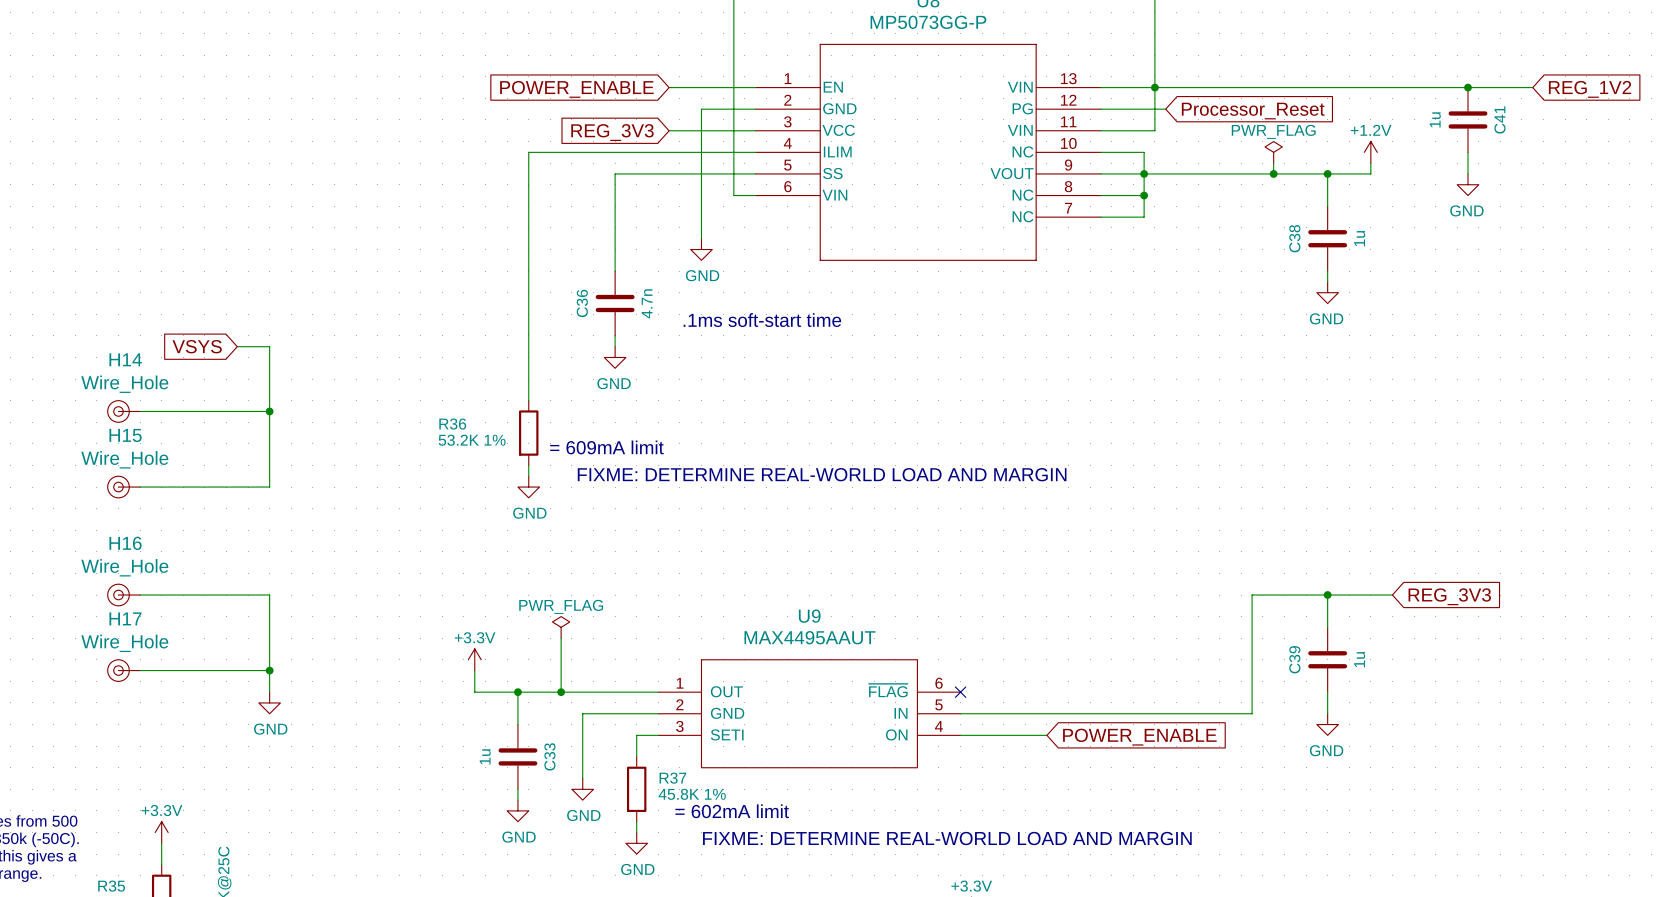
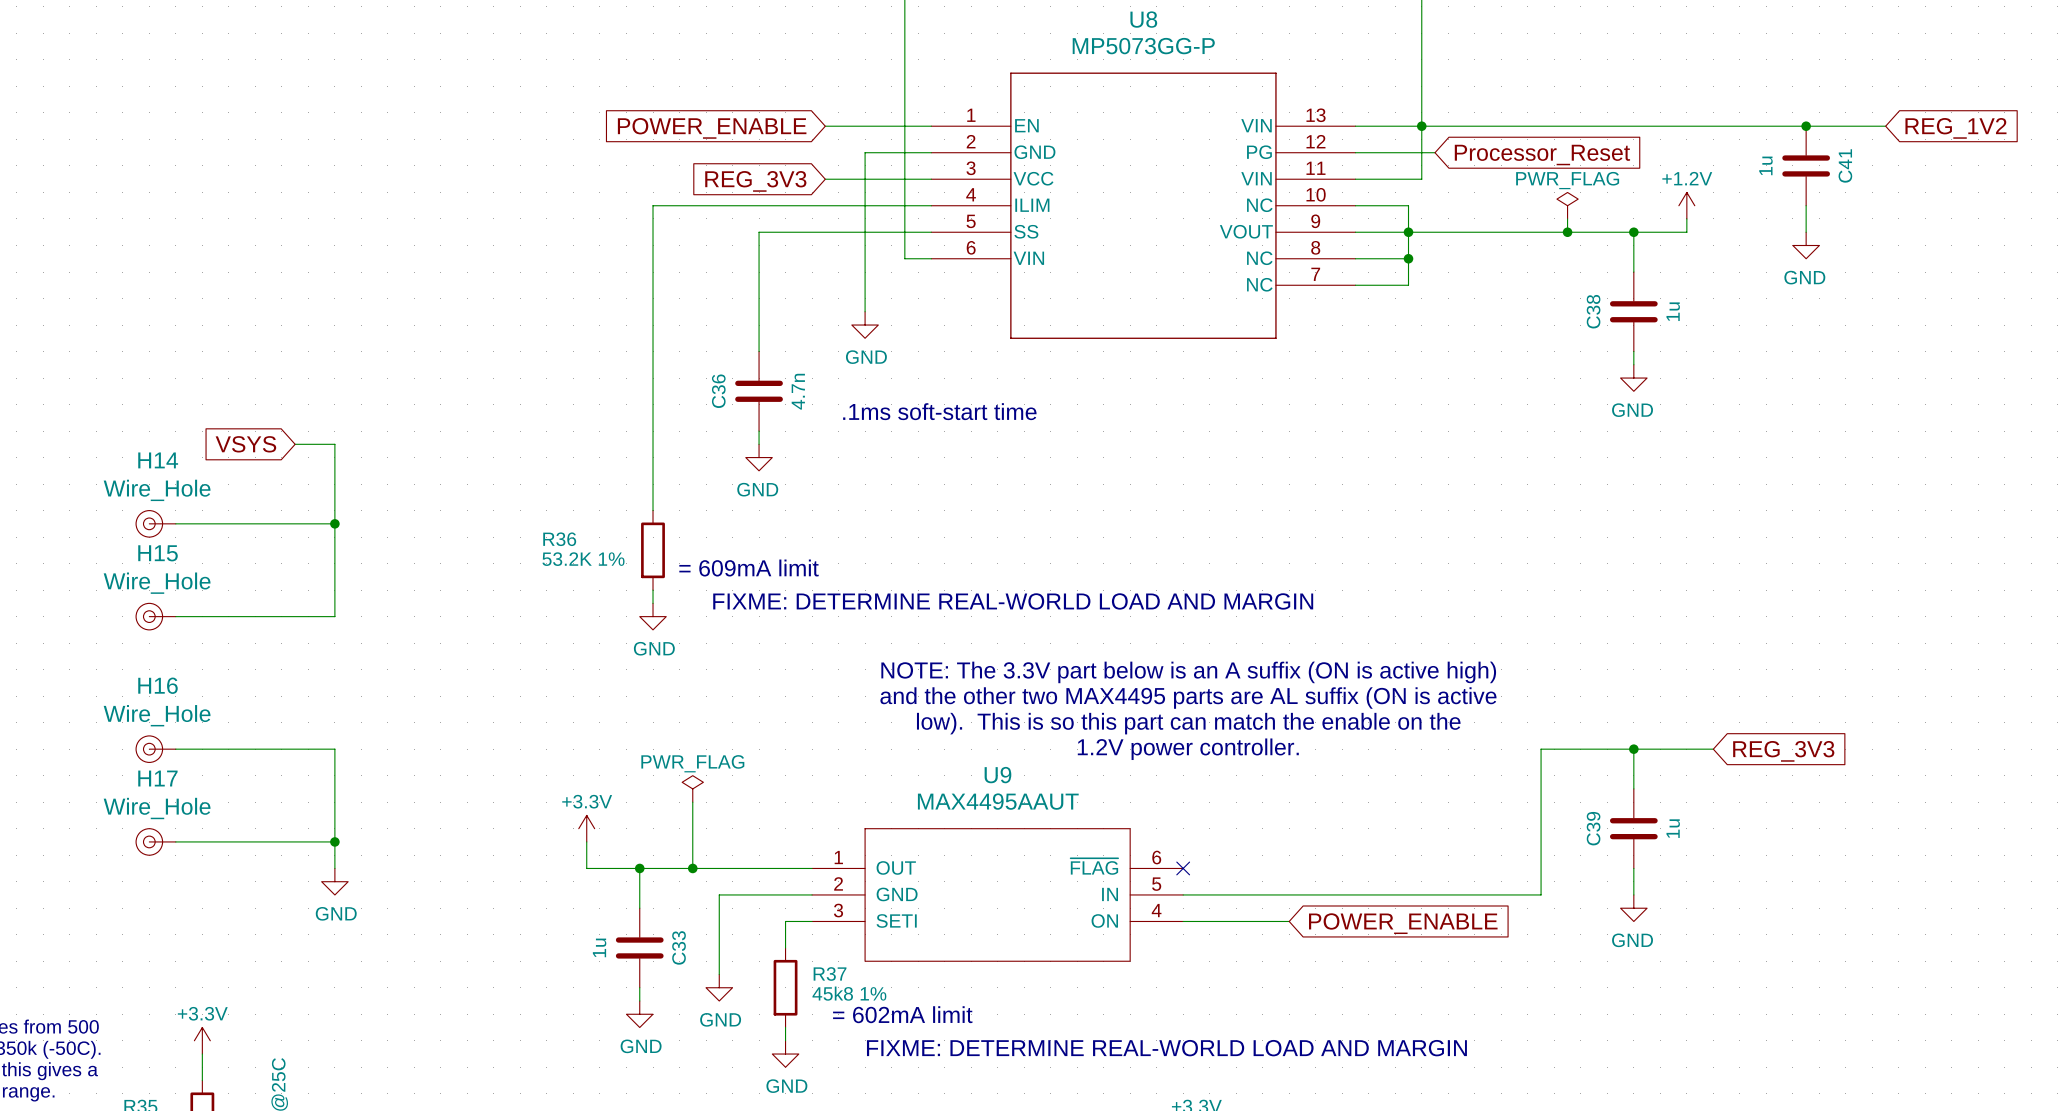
text: none -> NOTE: The 3.3V part below is an A suffix (ON is active high) (1188, 672)
text: none -> and the other two MAX4495 parts are AL suffix (ON is active (1188, 698)
text: none -> low). This is so this part can match the enable on the (1188, 723)
text: none -> 1.2V power controller. (1188, 749)
R37 value: 45.8K 1% (692, 794) -> 45k8 1% (849, 993)

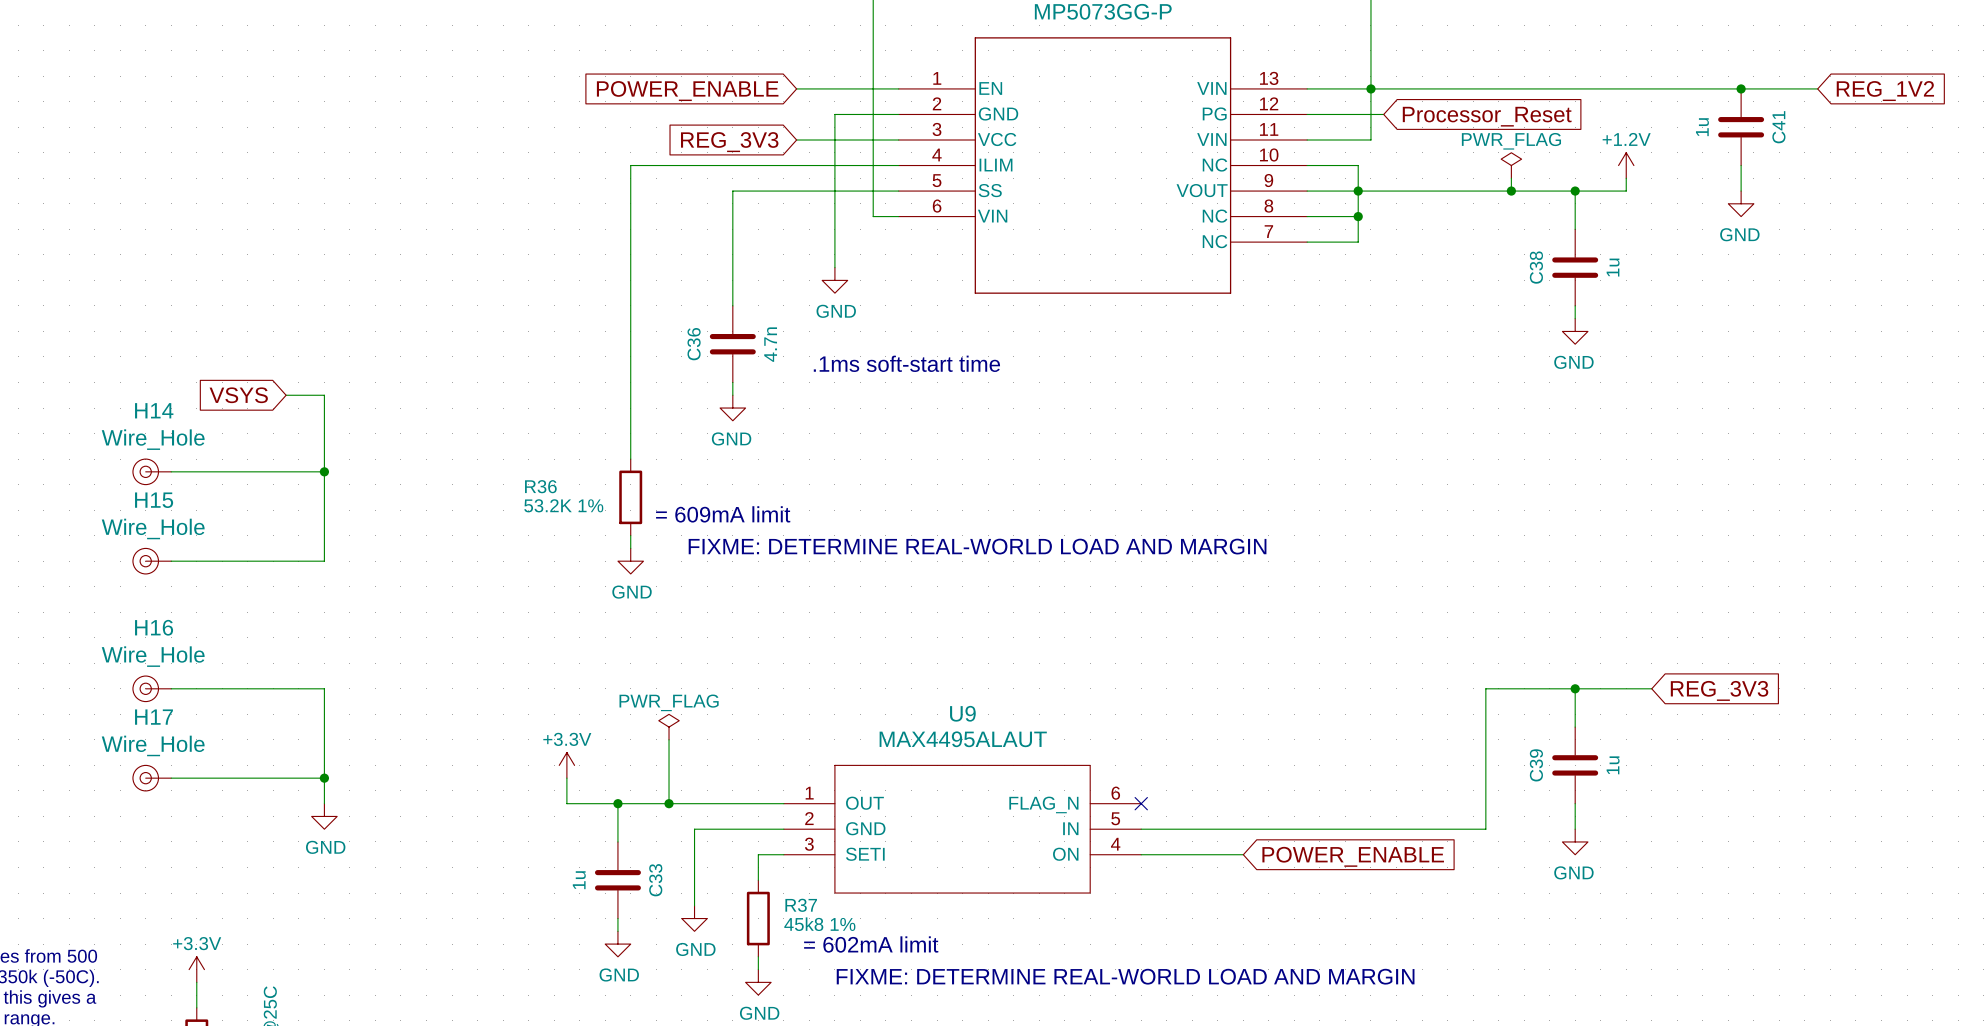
text: NOTE: The 3.3V part below is an A suffix (ON is active high) (1188, 672) -> none
text: and the other two MAX4495 parts are AL suffix (ON is active (1188, 698) -> none
text: low). This is so this part can match the enable on the (1188, 723) -> none
text: 1.2V power controller. (1188, 749) -> none
U9 value: MAX4495AAUT (998, 801) -> MAX4495ALAUT (963, 739)
U9 pin name: ~{FLAG} (1094, 866) -> FLAG_N (1043, 804)

